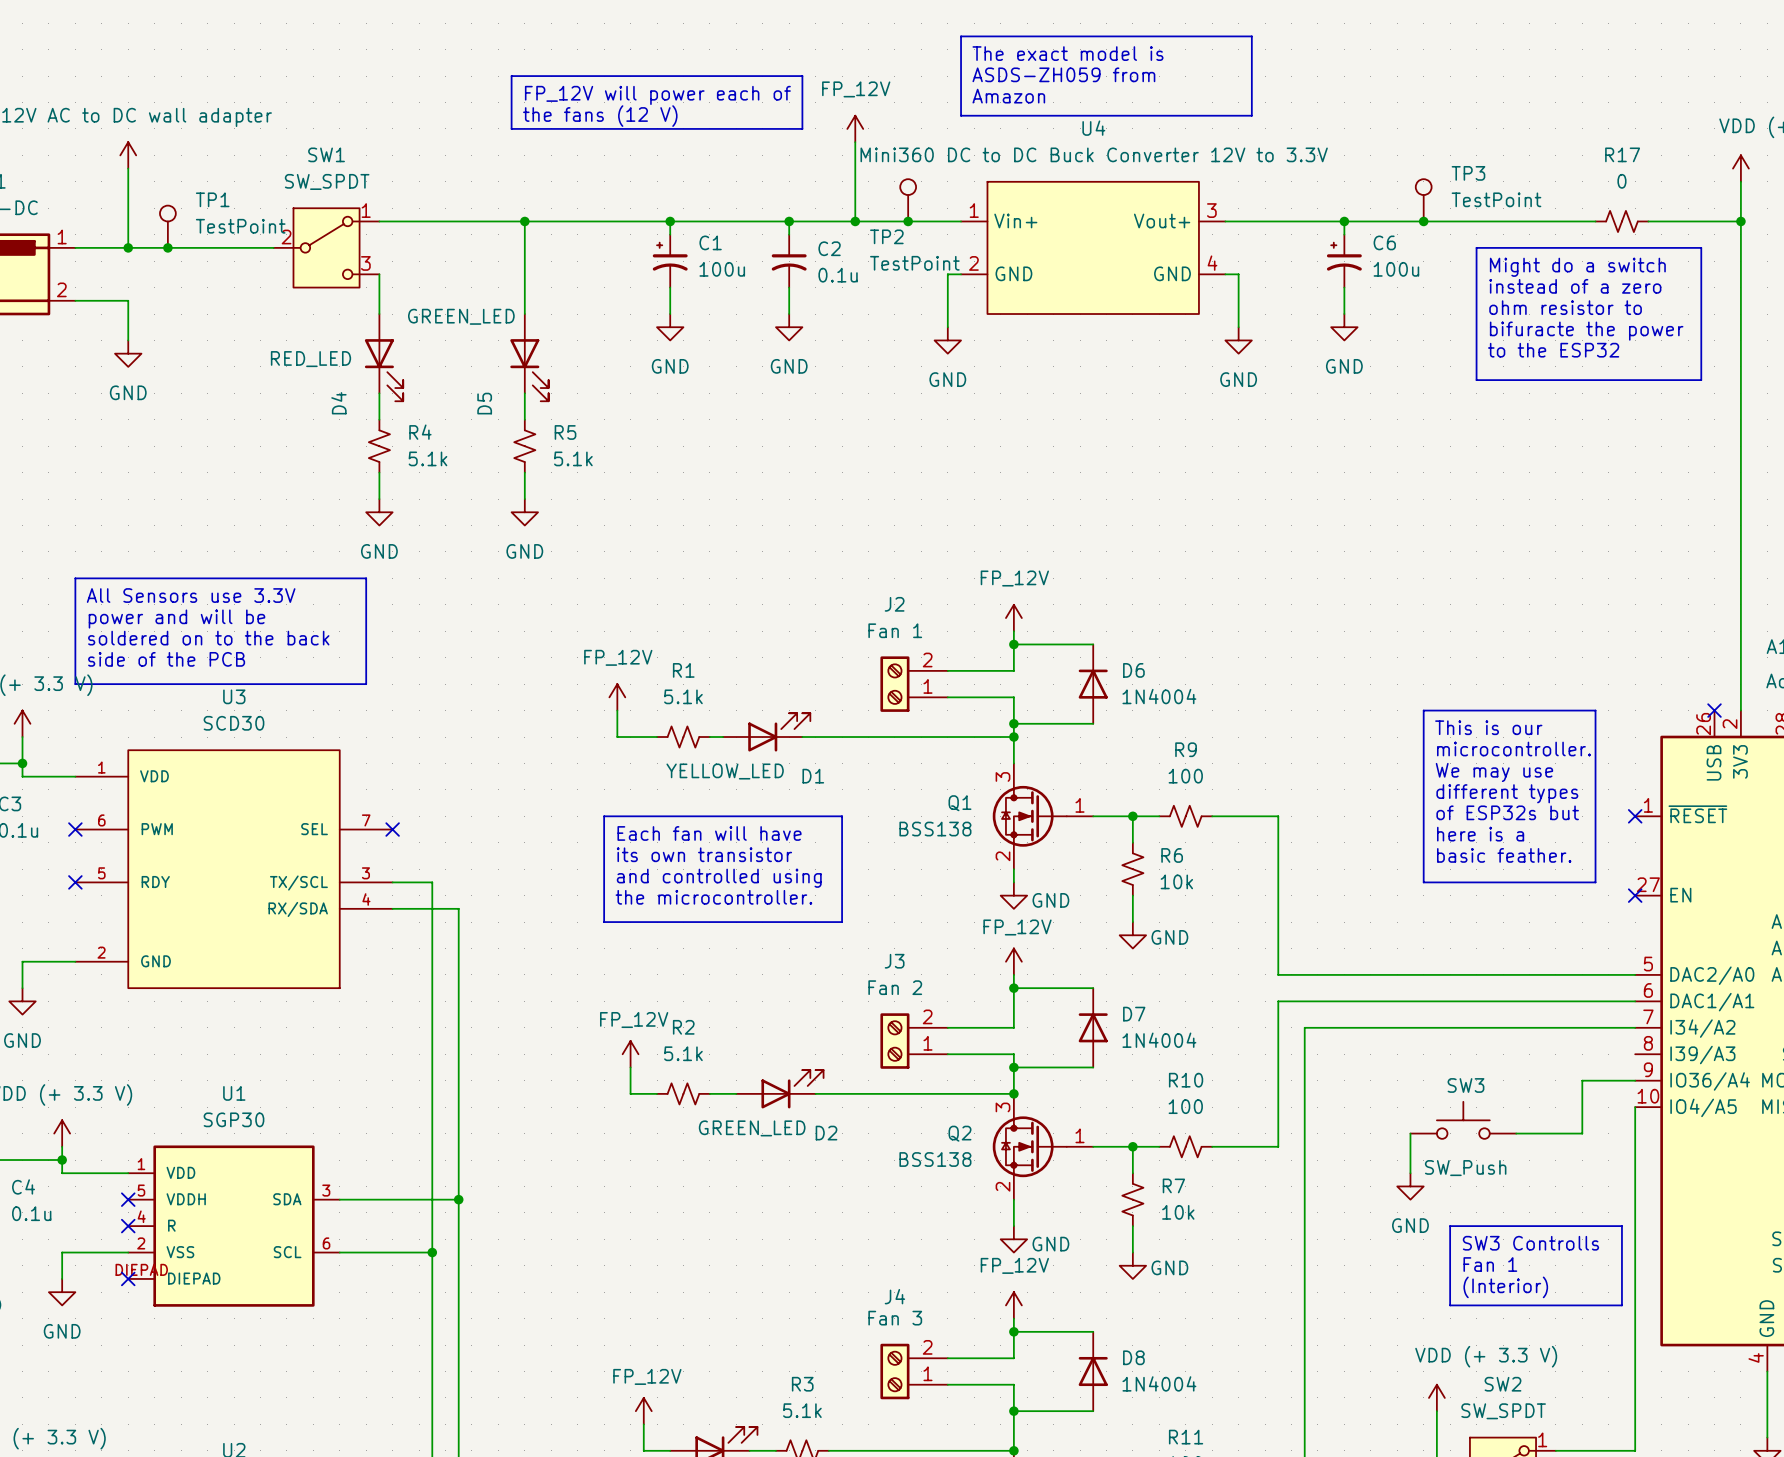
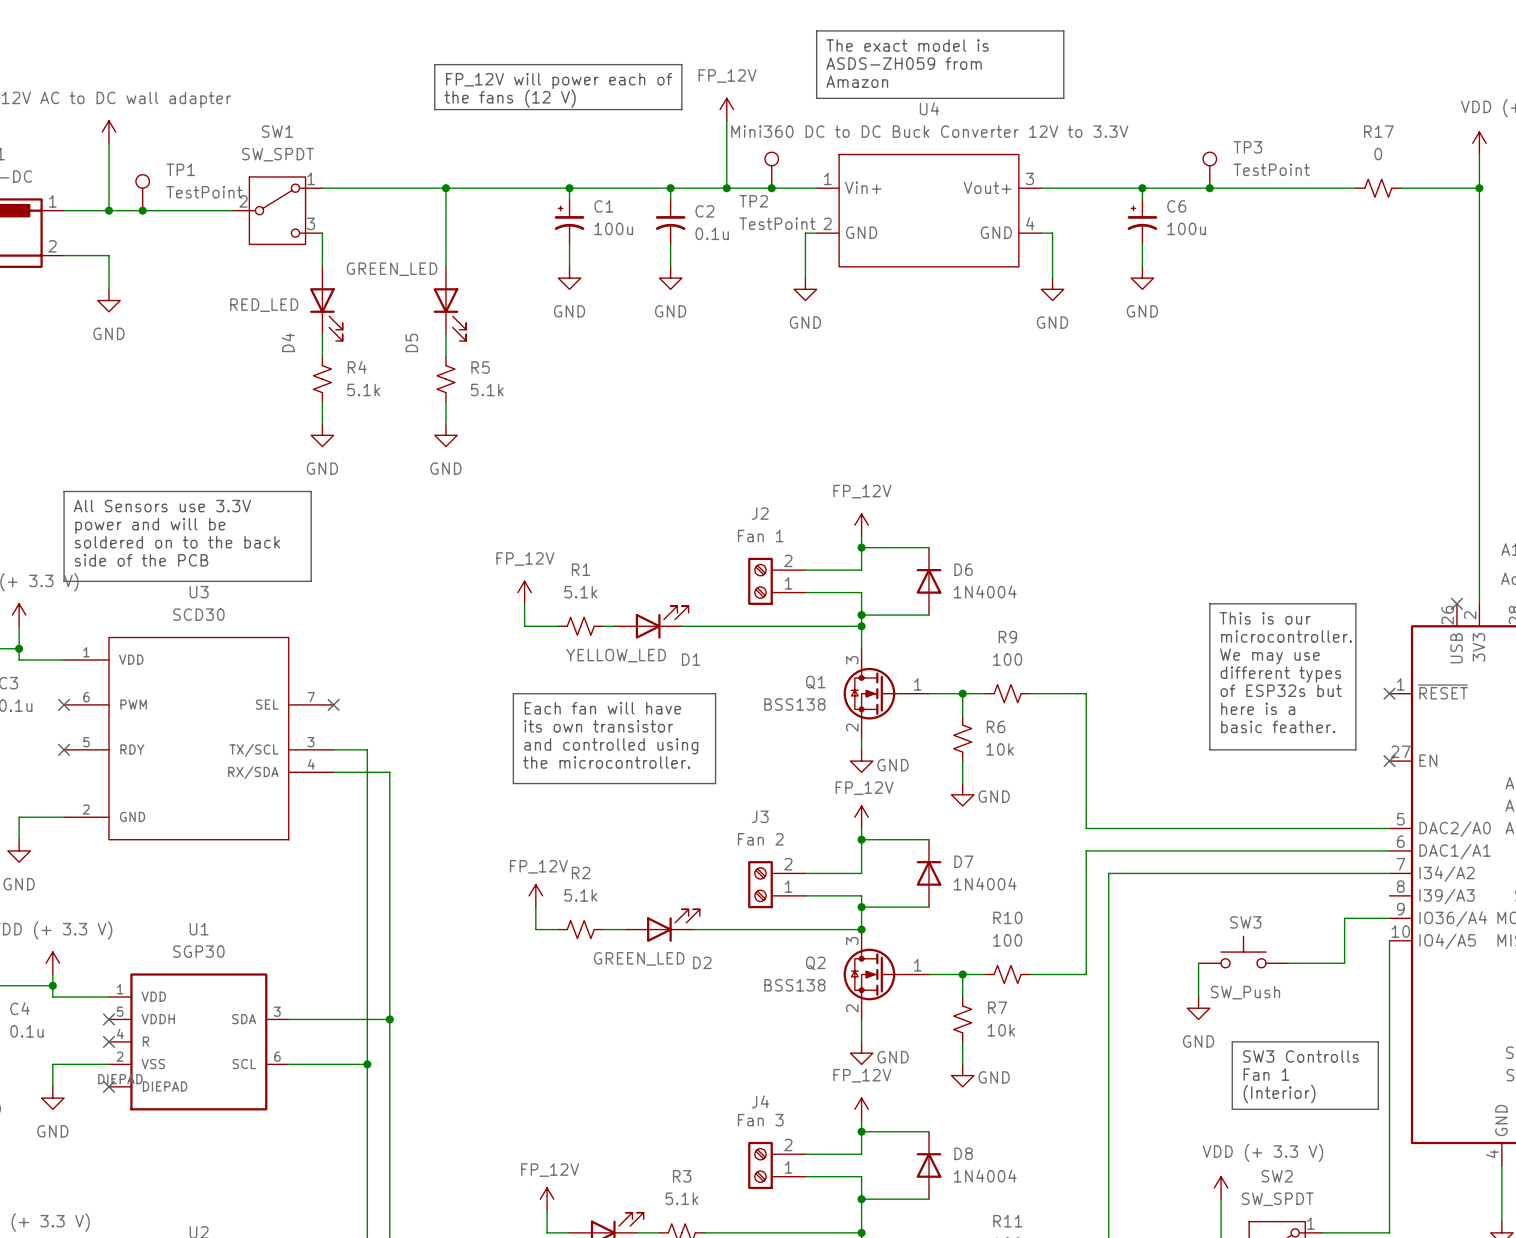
line: (1476, 247) (1701, 247) (1701, 380) (1476, 380) (1476, 247) -> none
text: Might do a switch (1577, 267) -> none
text: instead of a zero (1575, 286) -> none
text: ohm resistor to (1565, 307) -> none
text: bifuracte the power (1586, 331) -> none
text: to the ESP32 (1553, 350) -> none

